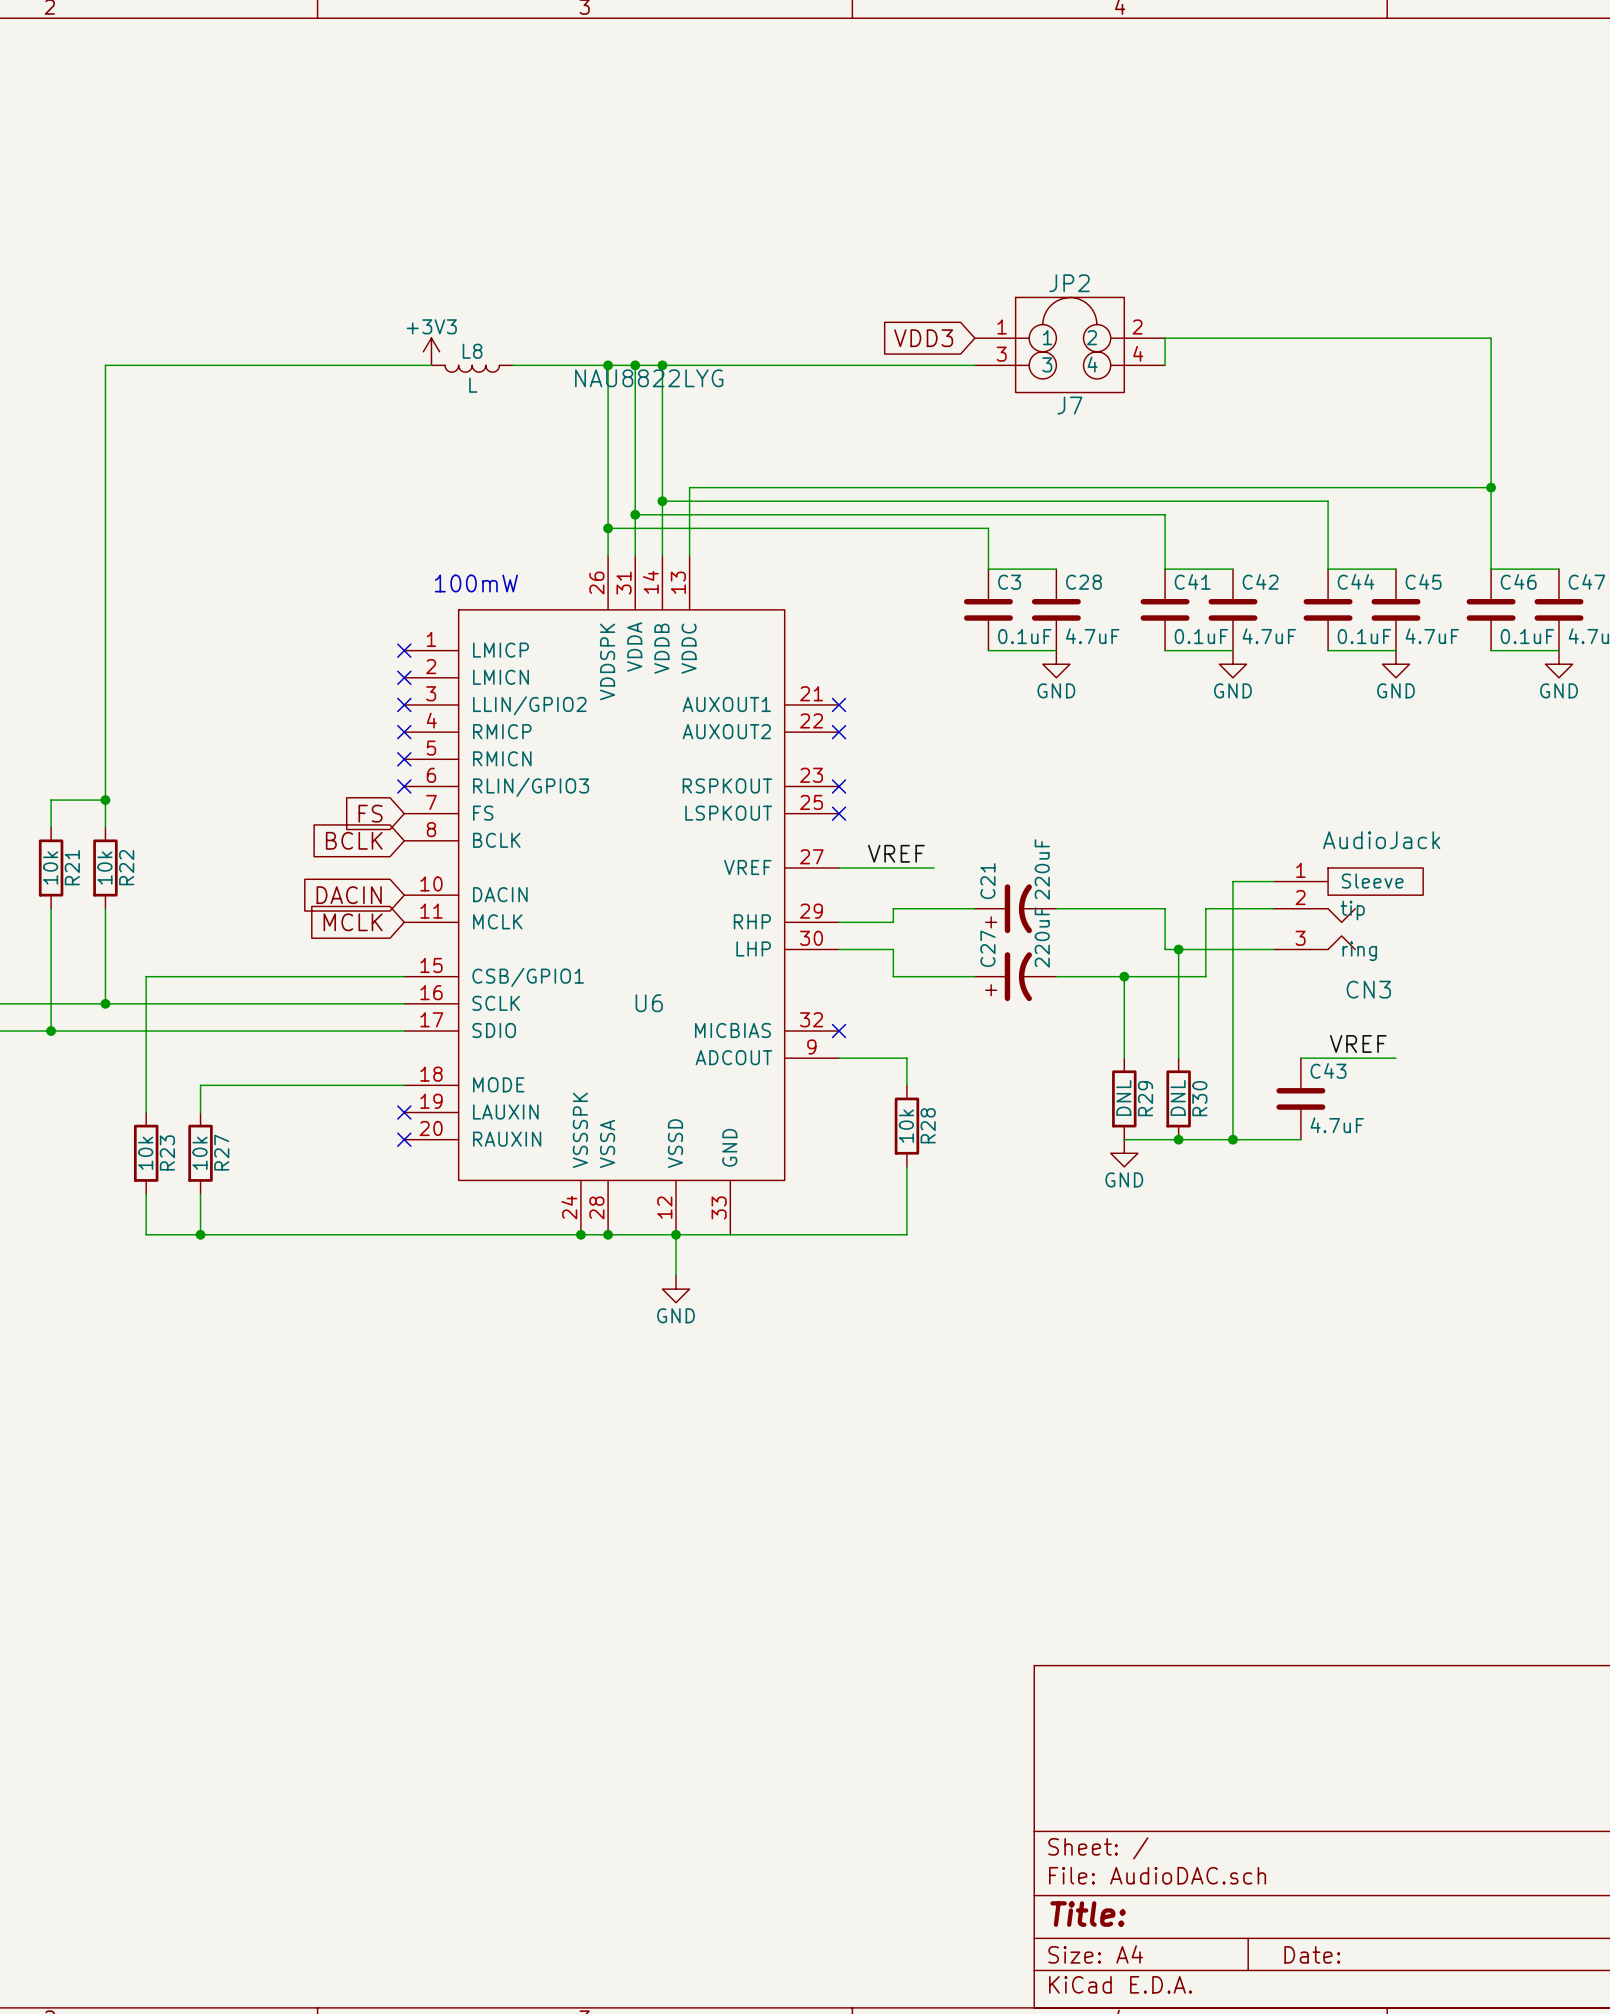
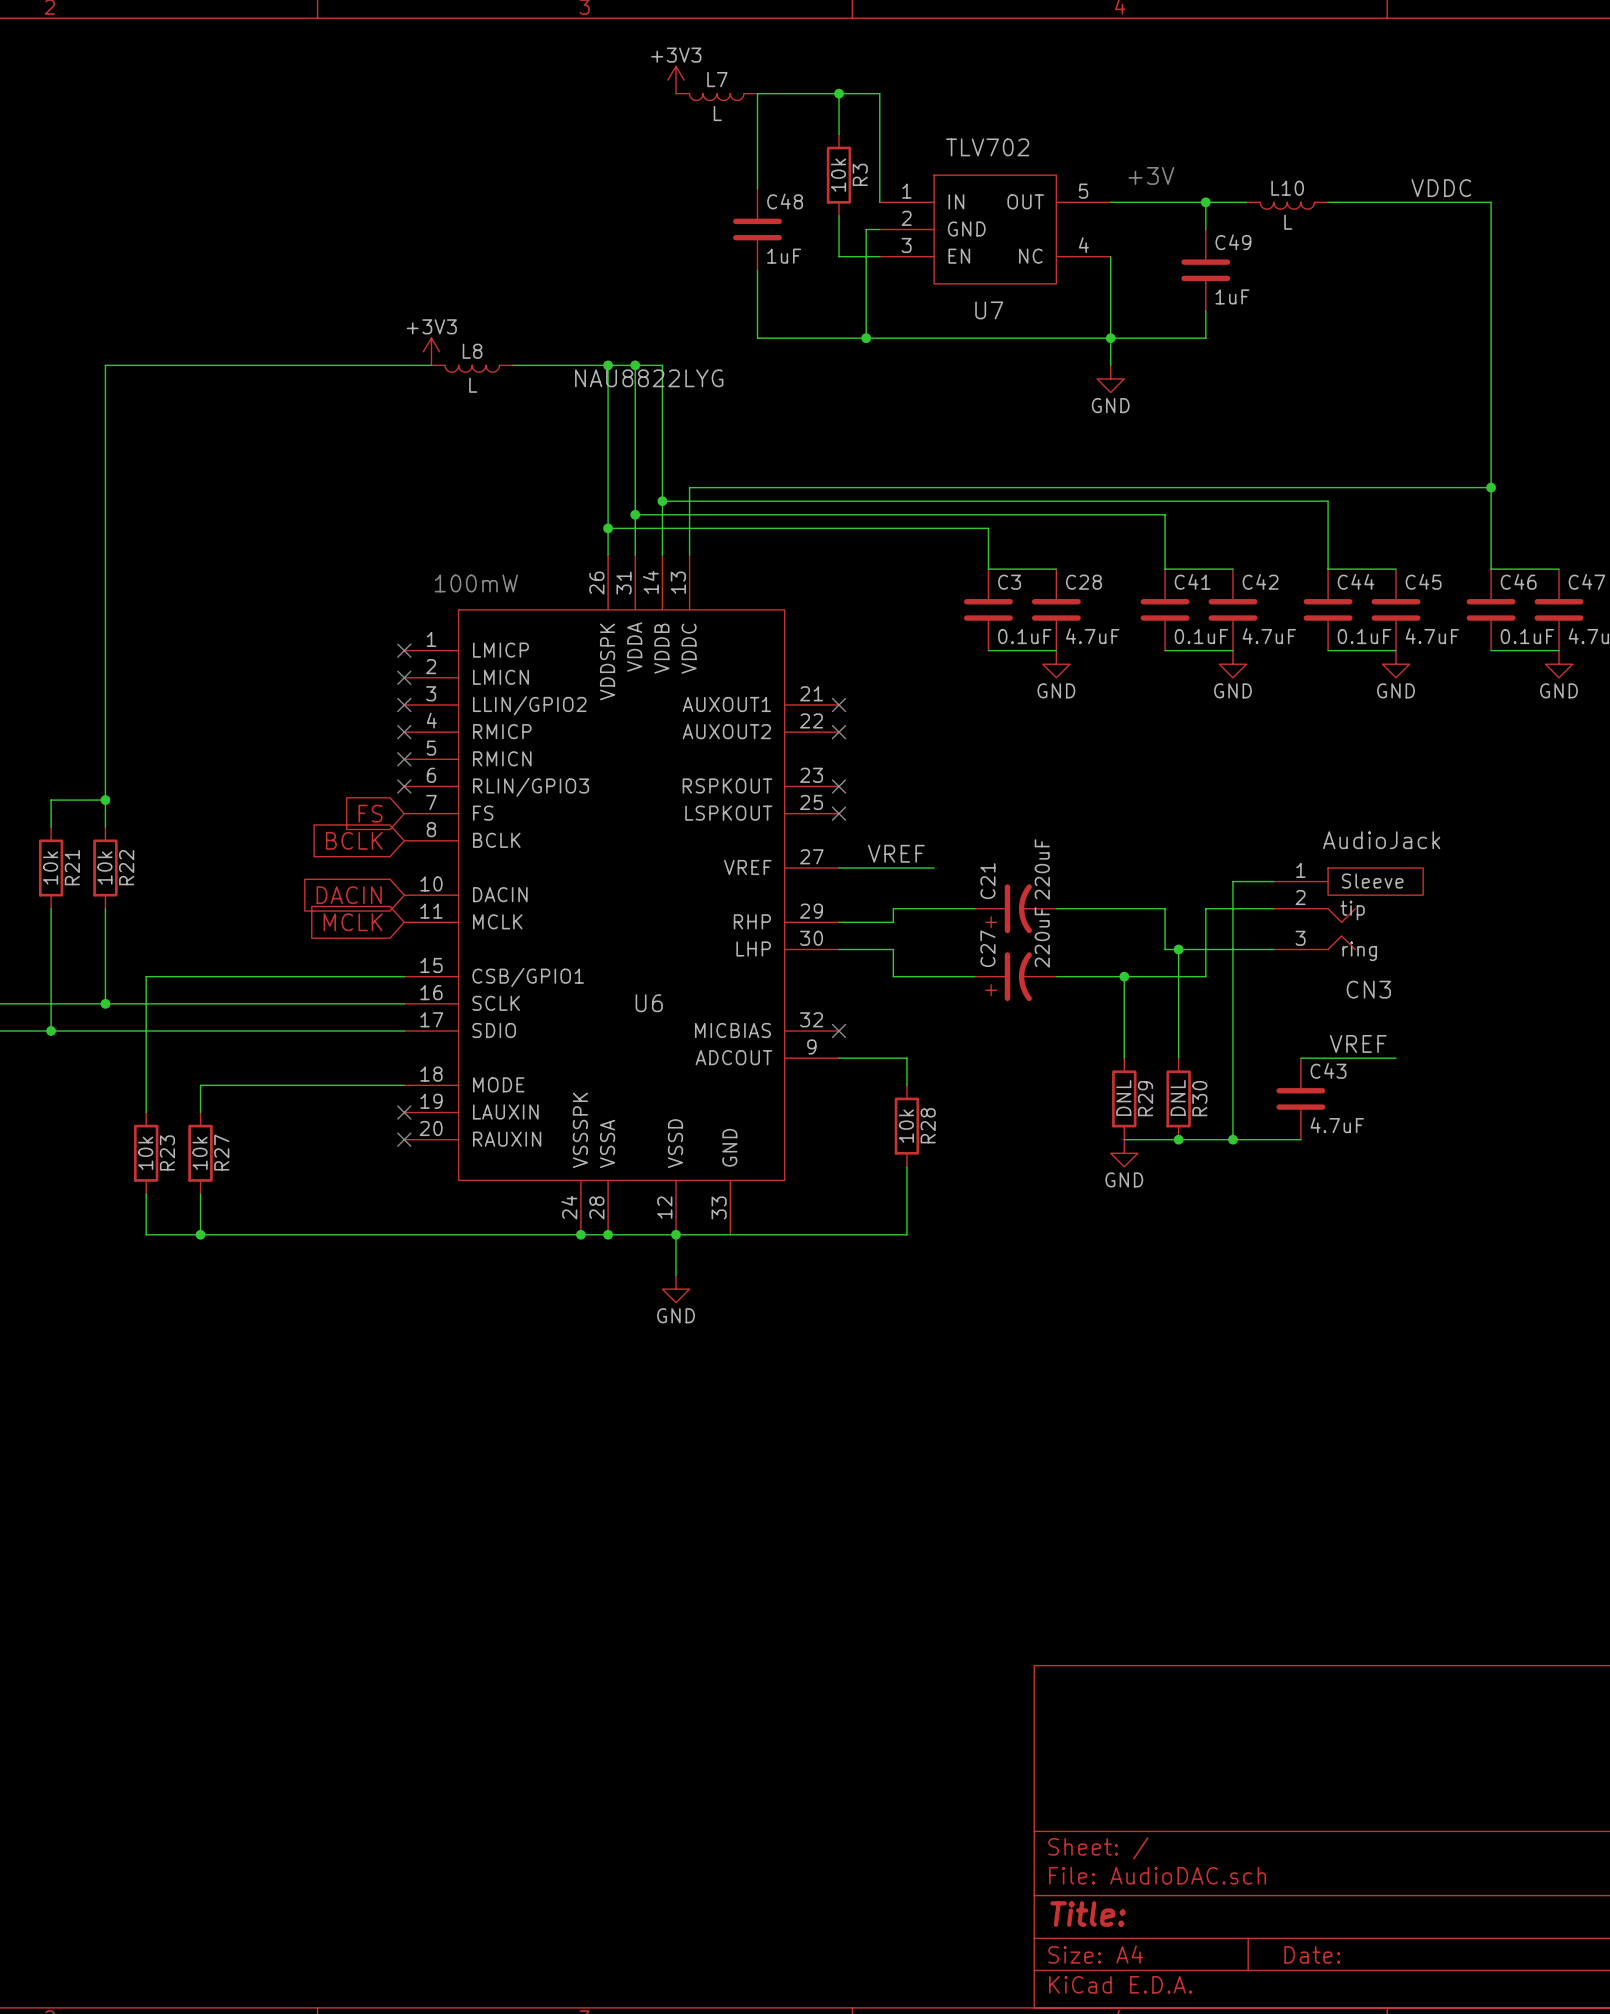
power symbol: none -> +3V3 (676, 80)
wire: none -> (839, 93) (839, 134)
junction: none -> (839, 93)
L7: none -> L (716, 97)
R3: none -> 10k (839, 175)
text: none -> +3V (1151, 175)
wire: none -> (757, 188) (757, 93) (879, 93) (879, 202)
label: none -> VDDC (1441, 188)
wire: none -> (1110, 202) (1246, 202)
wire: none -> (1205, 202) (1205, 229)
junction: none -> (1205, 202)
L10: none -> L (1287, 205)
wire: none -> (839, 215) (839, 256) (879, 256)
C48: none -> 1uF (757, 229)
wire: none -> (879, 229) (866, 229) (866, 338)
U7: none -> TLV702 (995, 229)
wire: none -> (1110, 256) (1110, 365)
C49: none -> 1uF (1205, 270)
wire: none -> (1205, 311) (1205, 338)
junction: none -> (866, 338)
global label: VDD3 (923, 338) -> none
junction: none -> (1110, 338)
wire: (1165, 338) (1165, 365) -> (1165, 338) (757, 338) (757, 270)
wire: (1205, 338) (1491, 338) -> (1328, 202) (1491, 202) (1491, 338)
J7: JP2 (1069, 344) -> none
wire: (662, 365) (974, 365) -> none
junction: (662, 365) -> none
power symbol: none -> GND (1110, 378)

